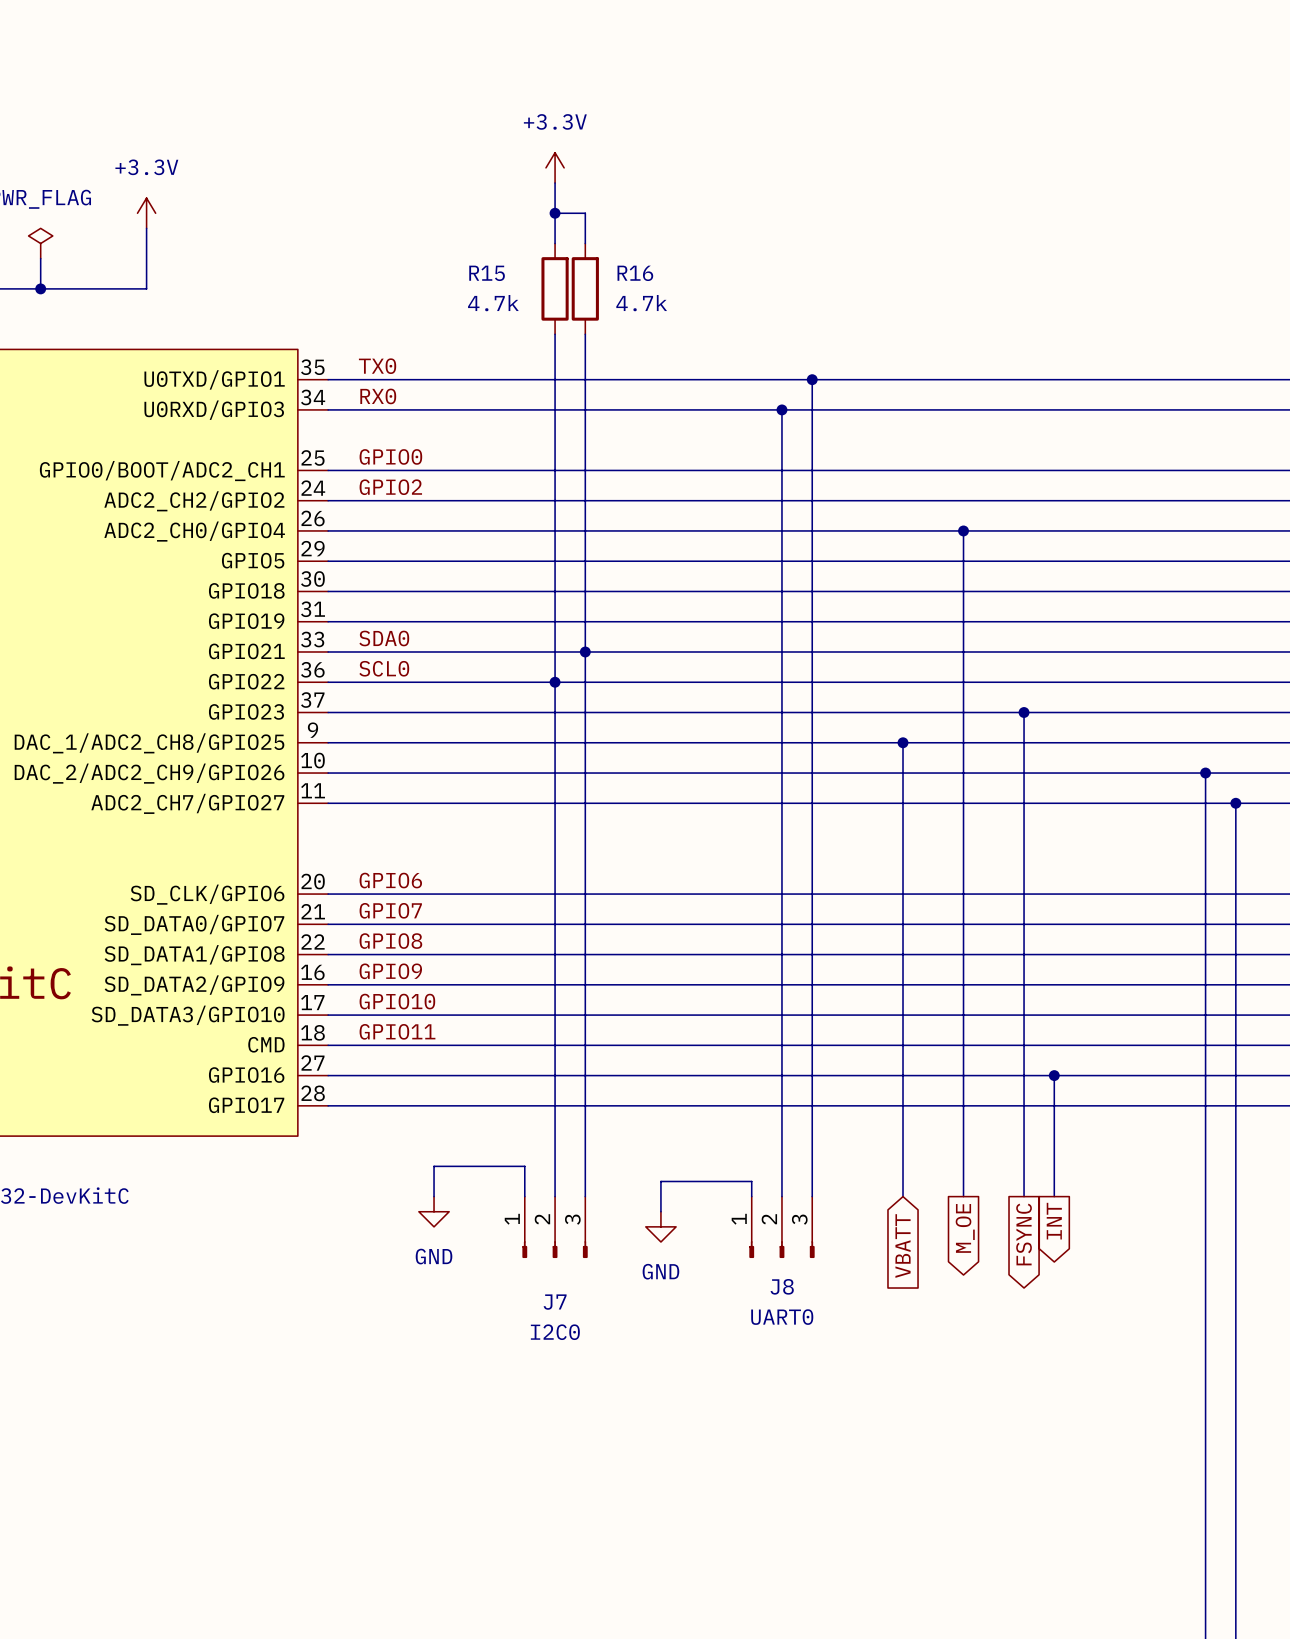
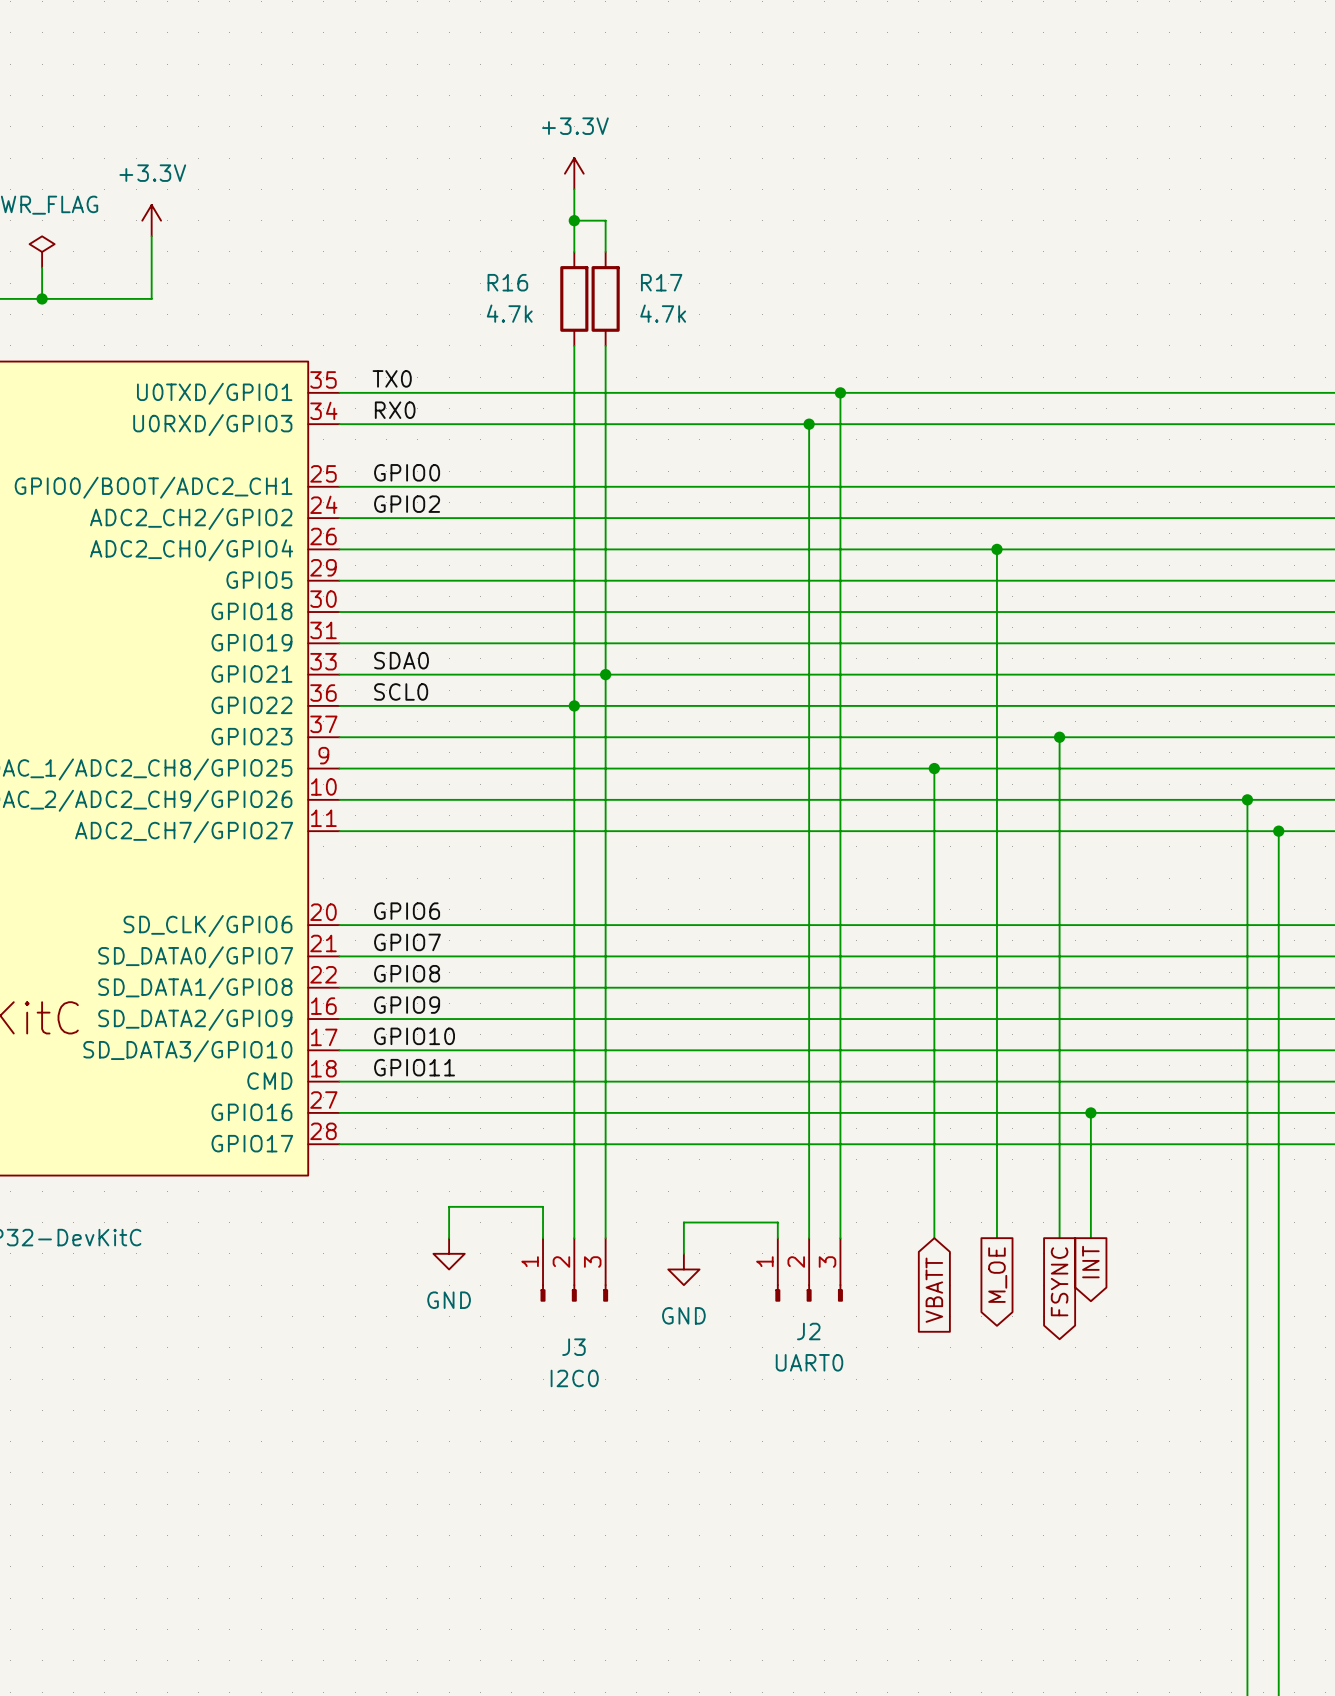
R15 name: R15 (487, 273) -> R16 (507, 282)
R16 name: R16 (635, 273) -> R17 (661, 282)
J8 name: J8 (782, 1286) -> J2 (808, 1331)
J7 name: J7 (555, 1302) -> J3 (573, 1347)

